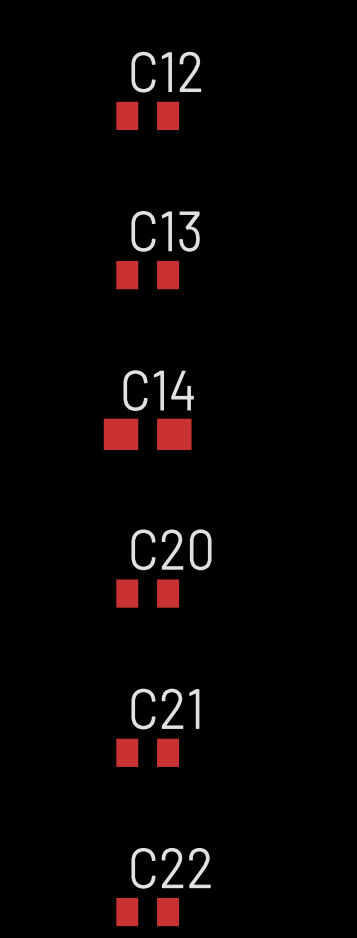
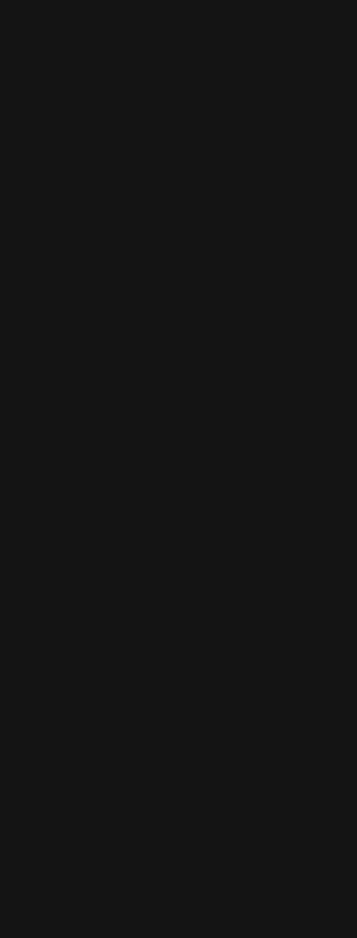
C12: (147, 115) -> none
C13: (147, 275) -> none
C14: (147, 434) -> none
C20: (147, 593) -> none
C21: (147, 752) -> none
C22: (147, 912) -> none

